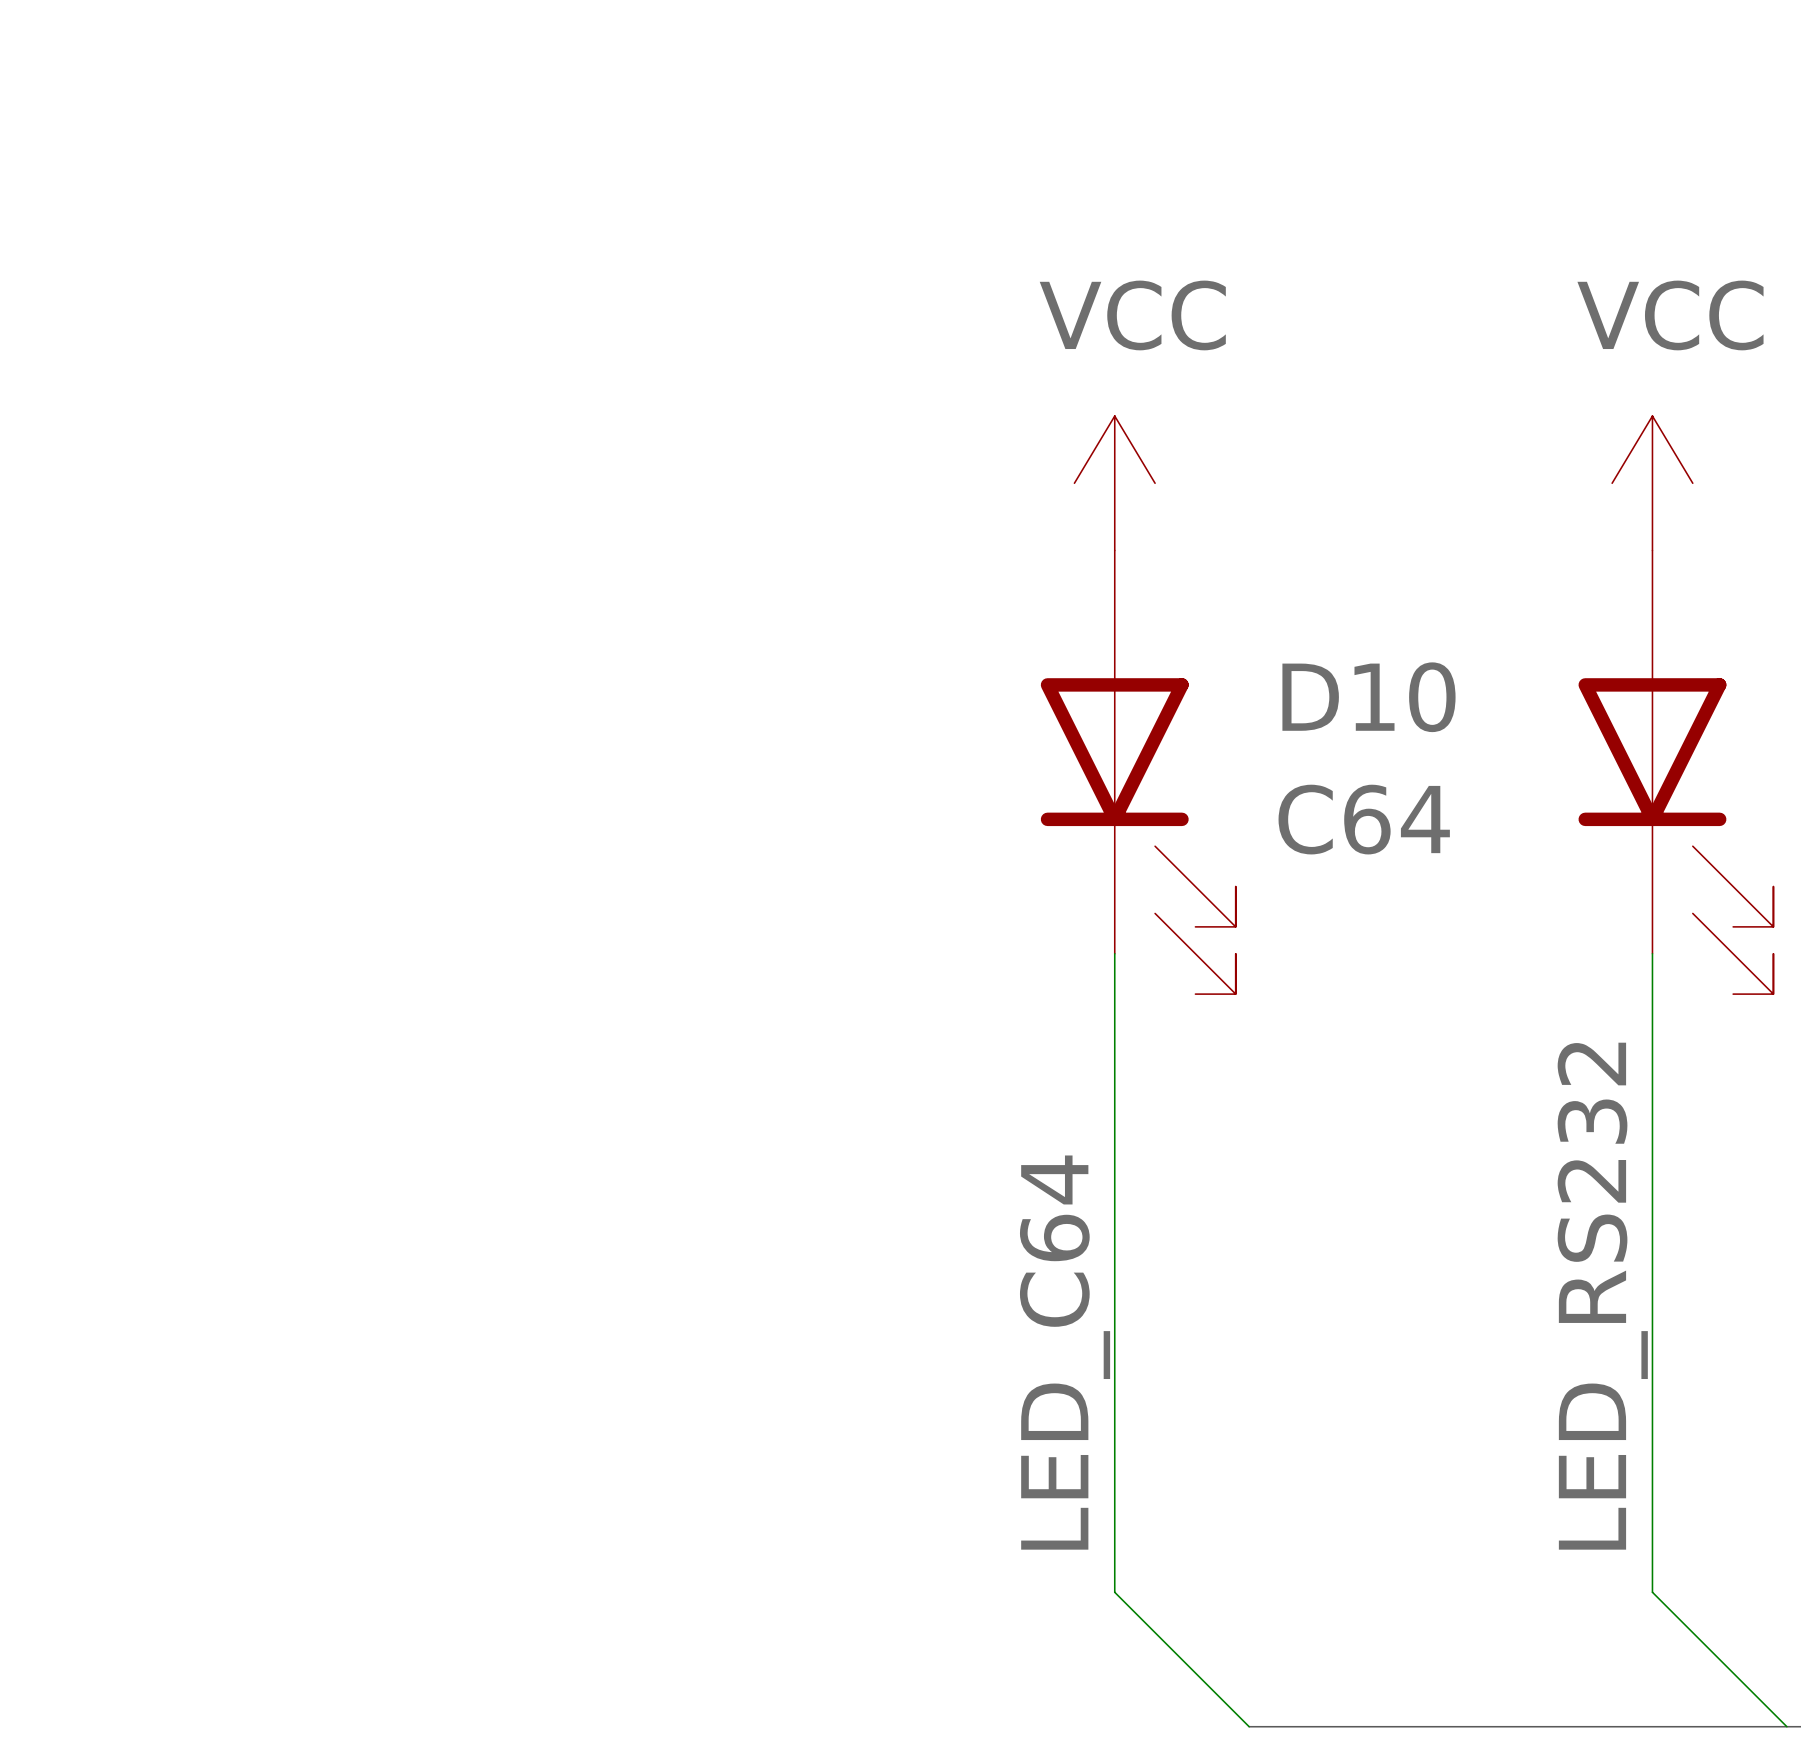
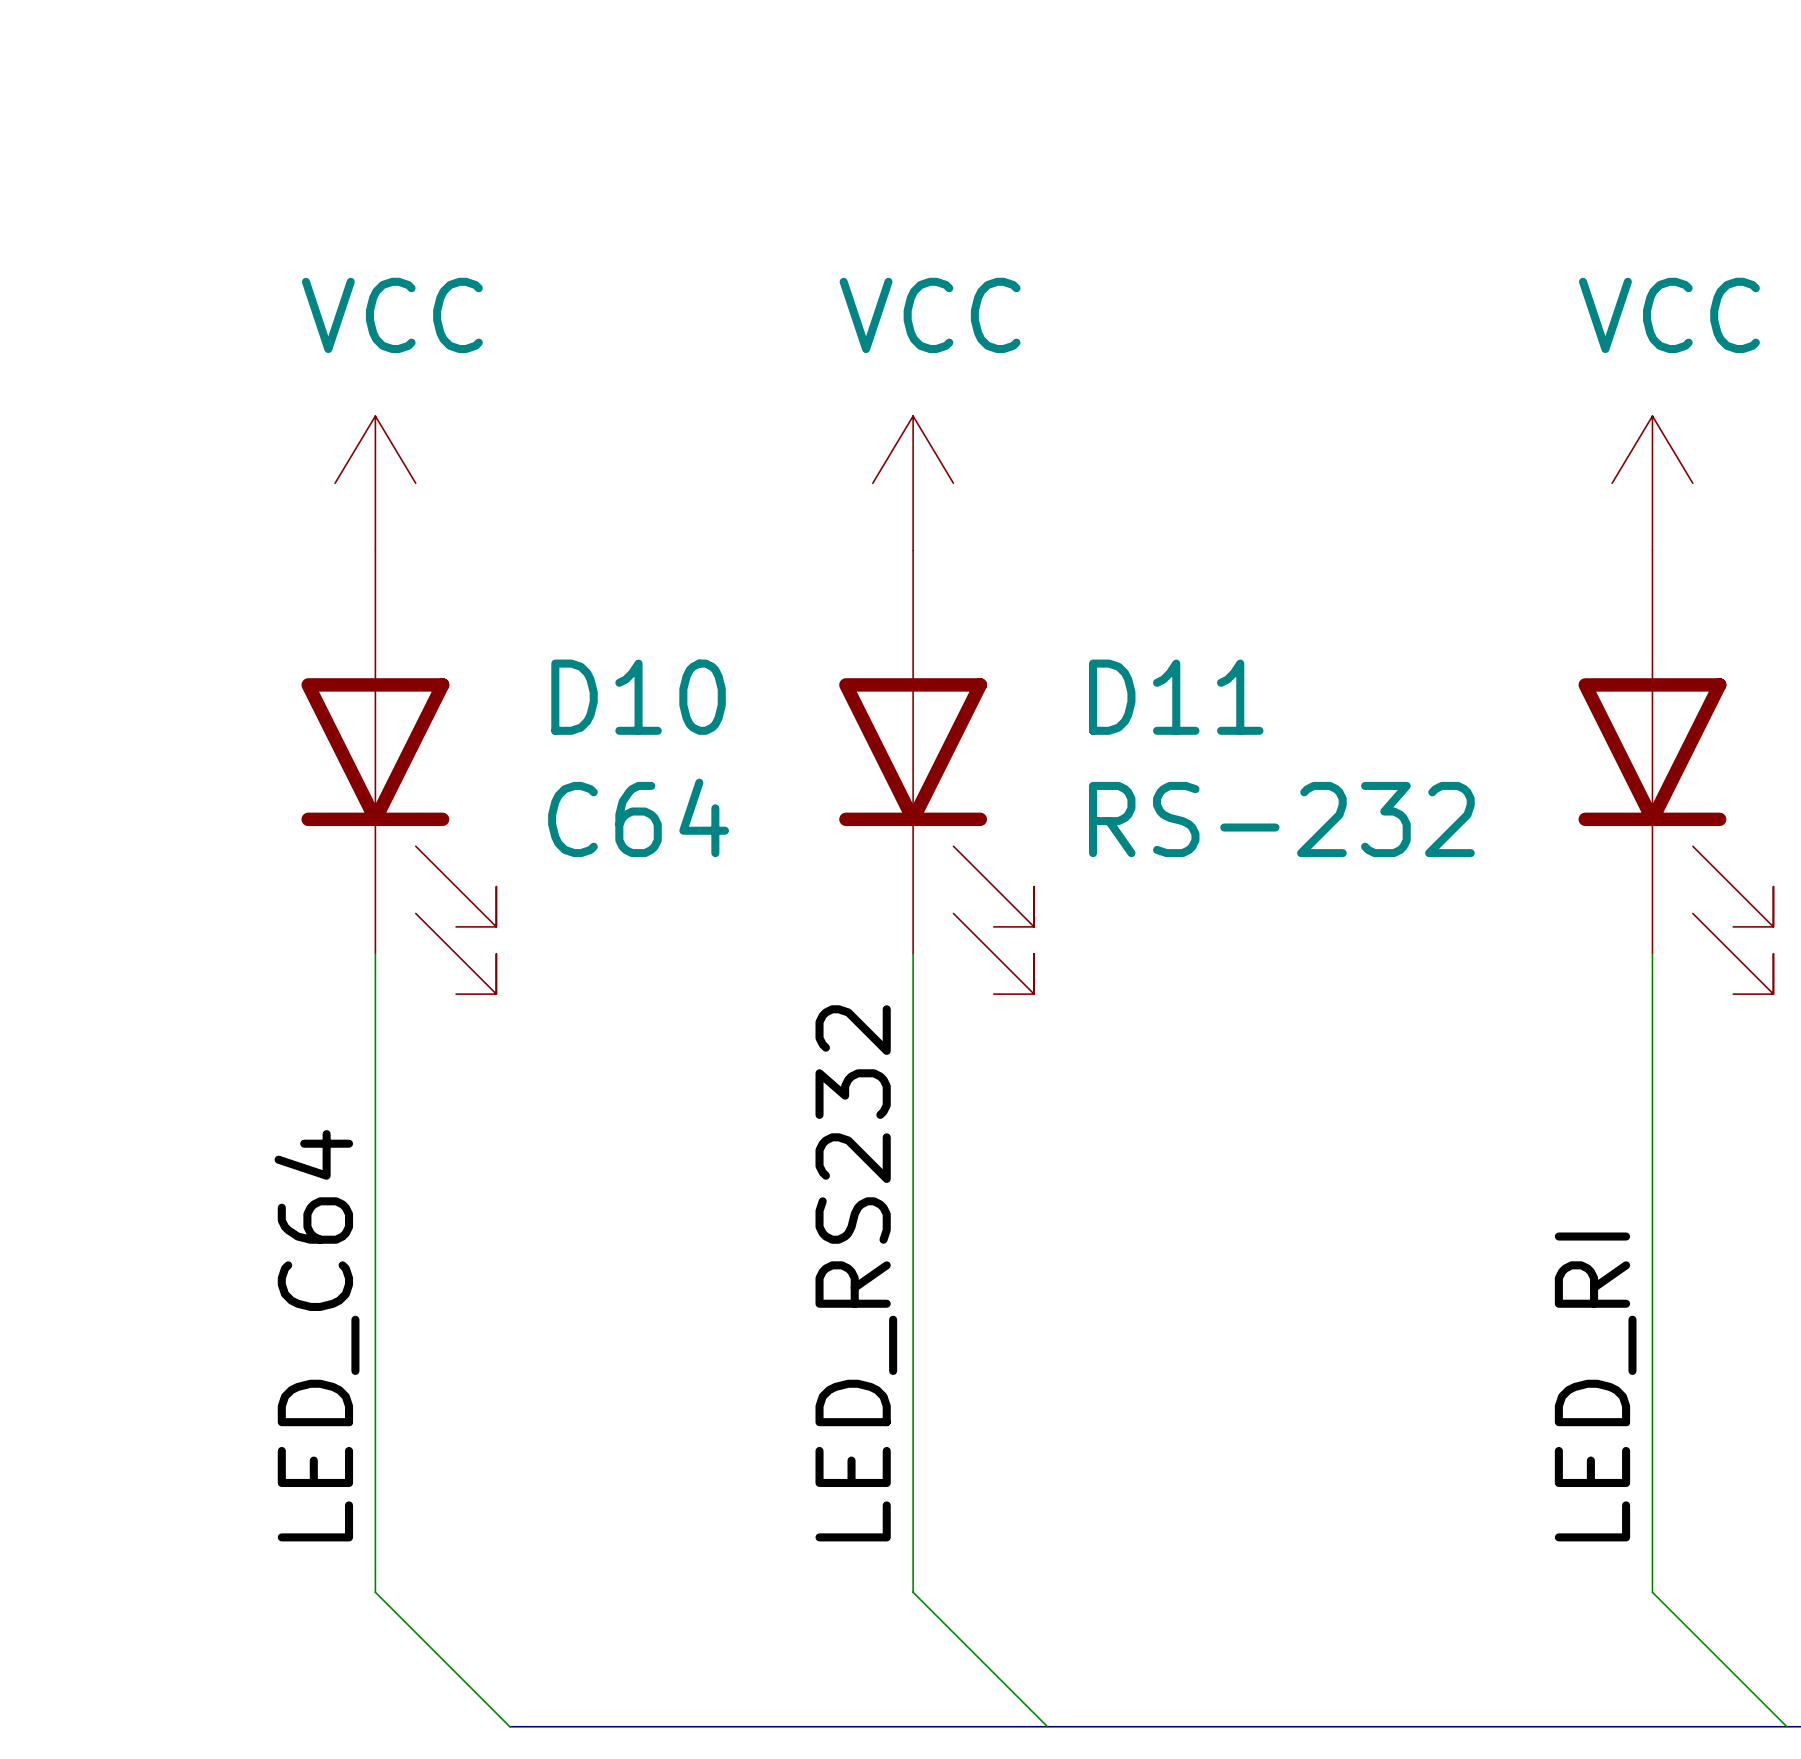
power symbol: none -> VCC (375, 483)
power symbol position: VCC (1114, 483) -> VCC (913, 483)
D11: none -> RS-232 (936, 772)
D10 position: (1138, 772) -> (398, 772)
wire: none -> (375, 953) (375, 1592) (509, 1726)
wire: (1114, 953) (1114, 1592) (1249, 1726) -> (913, 953) (913, 1592) (1047, 1726)
label: none -> LED_RS232 (856, 1273)
label: LED_RS232 (1602, 1296) -> LED_RI (1595, 1386)
label position: LED_C64 (1065, 1352) -> LED_C64 (317, 1335)
bus: none -> (509, 1726) (1249, 1726)

